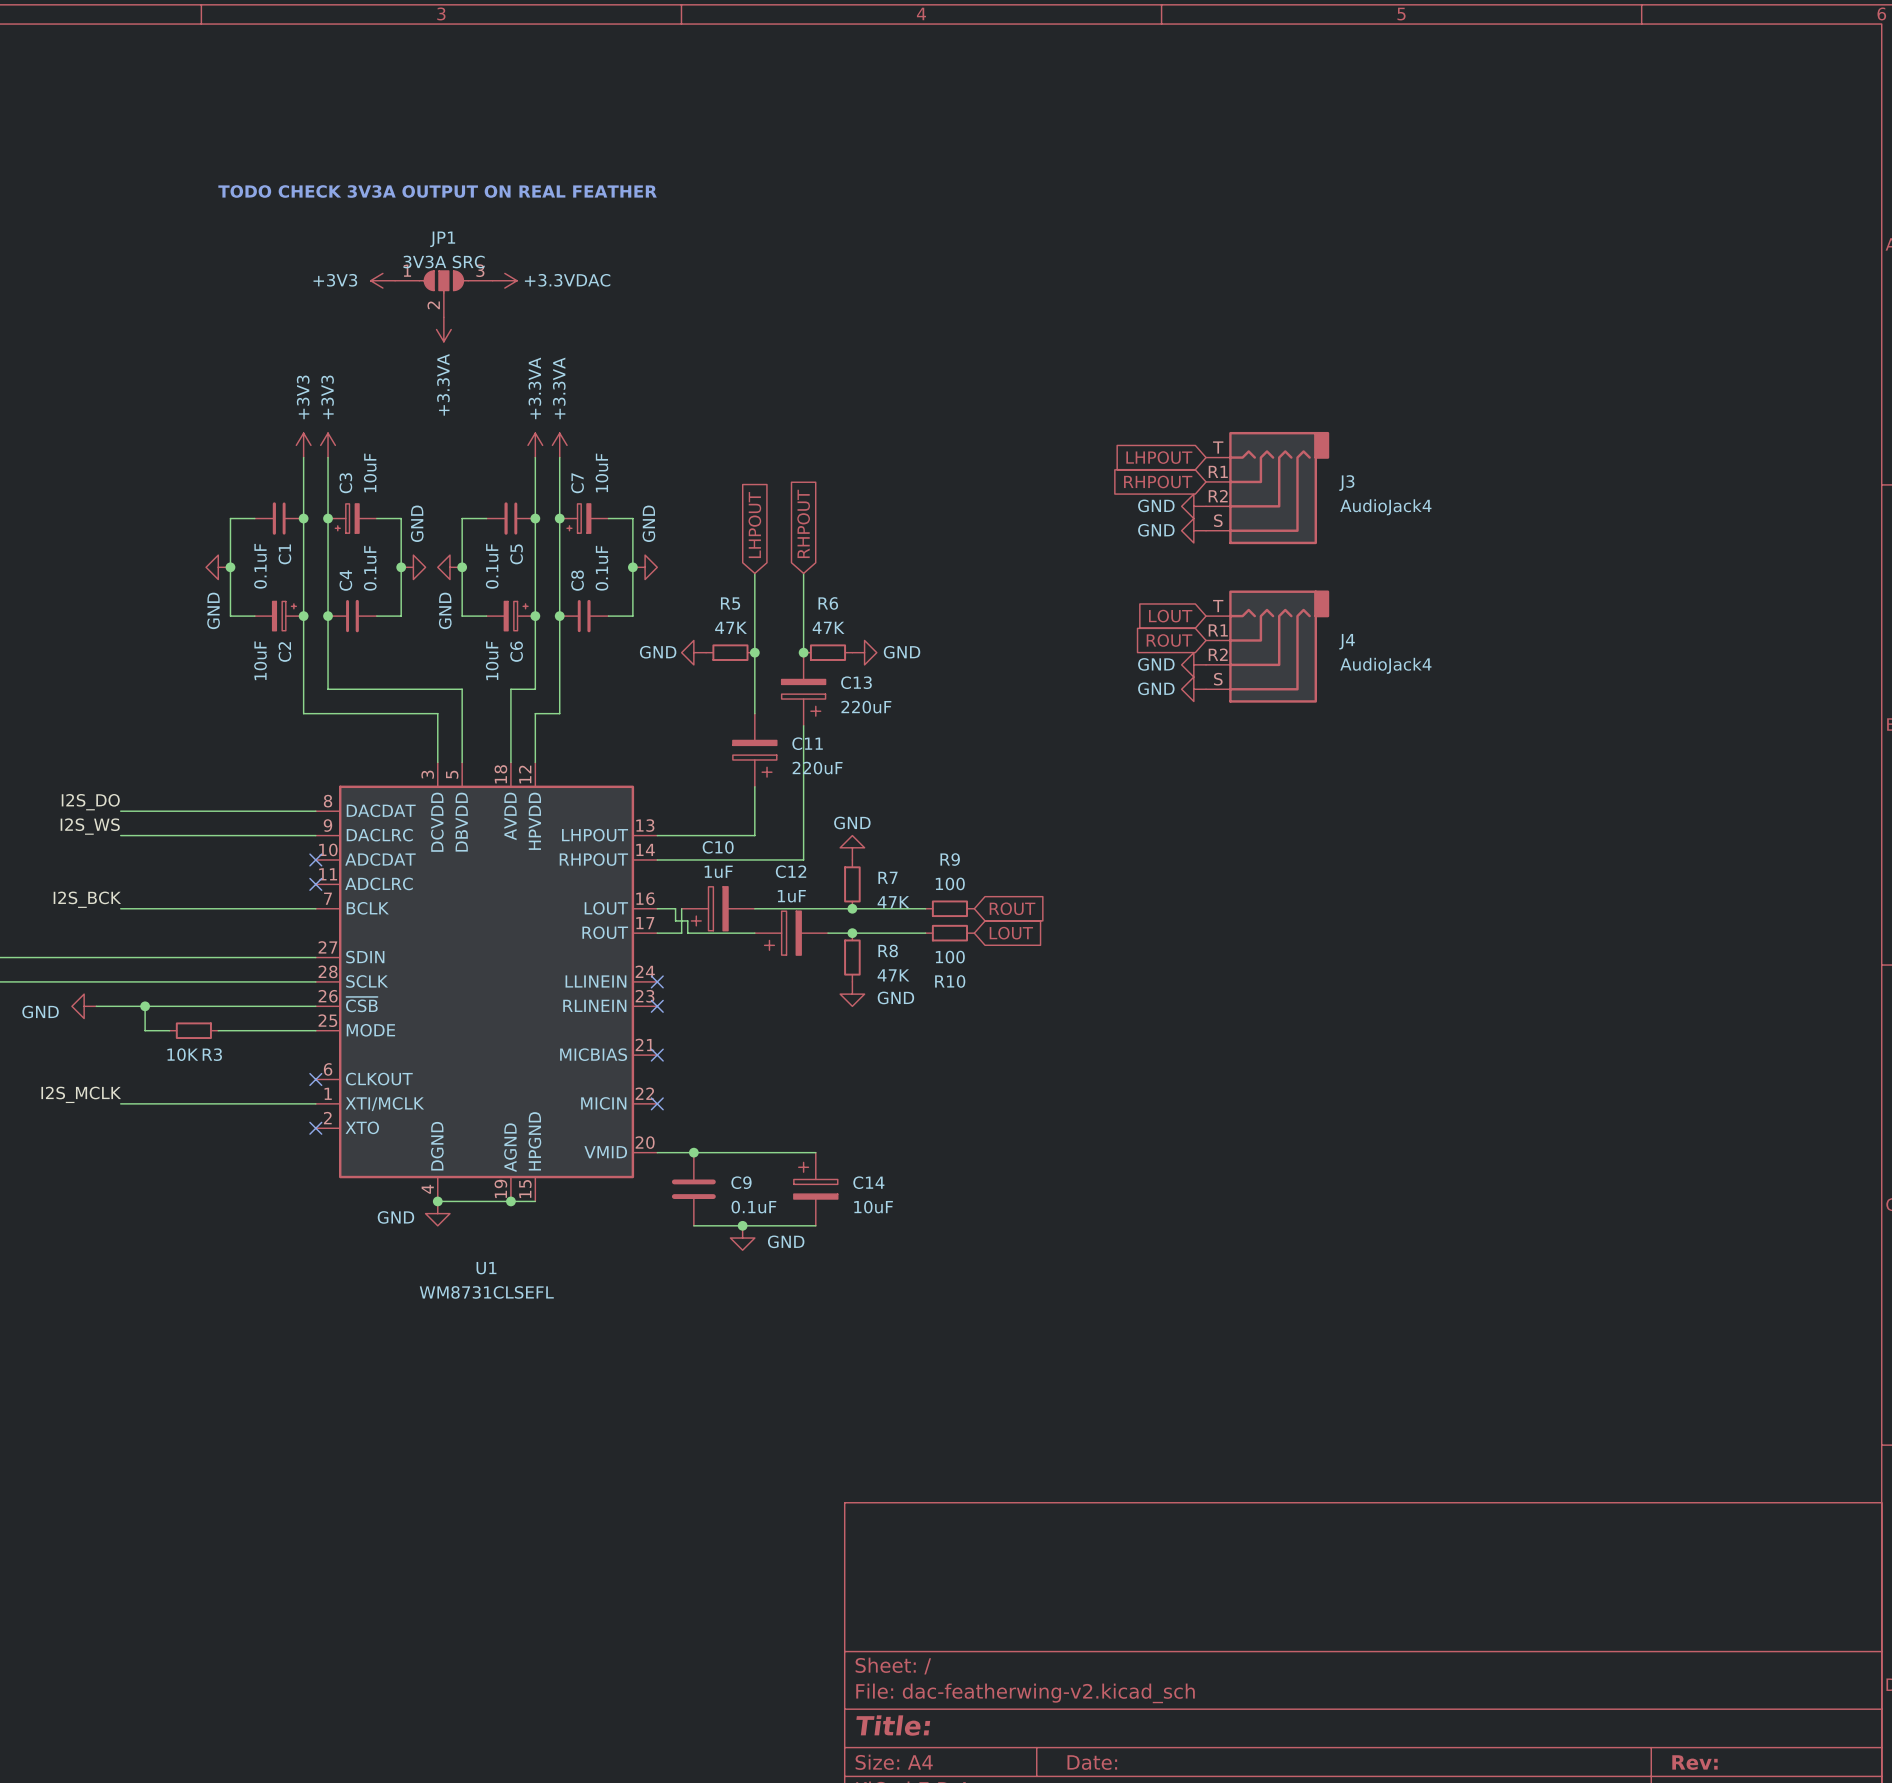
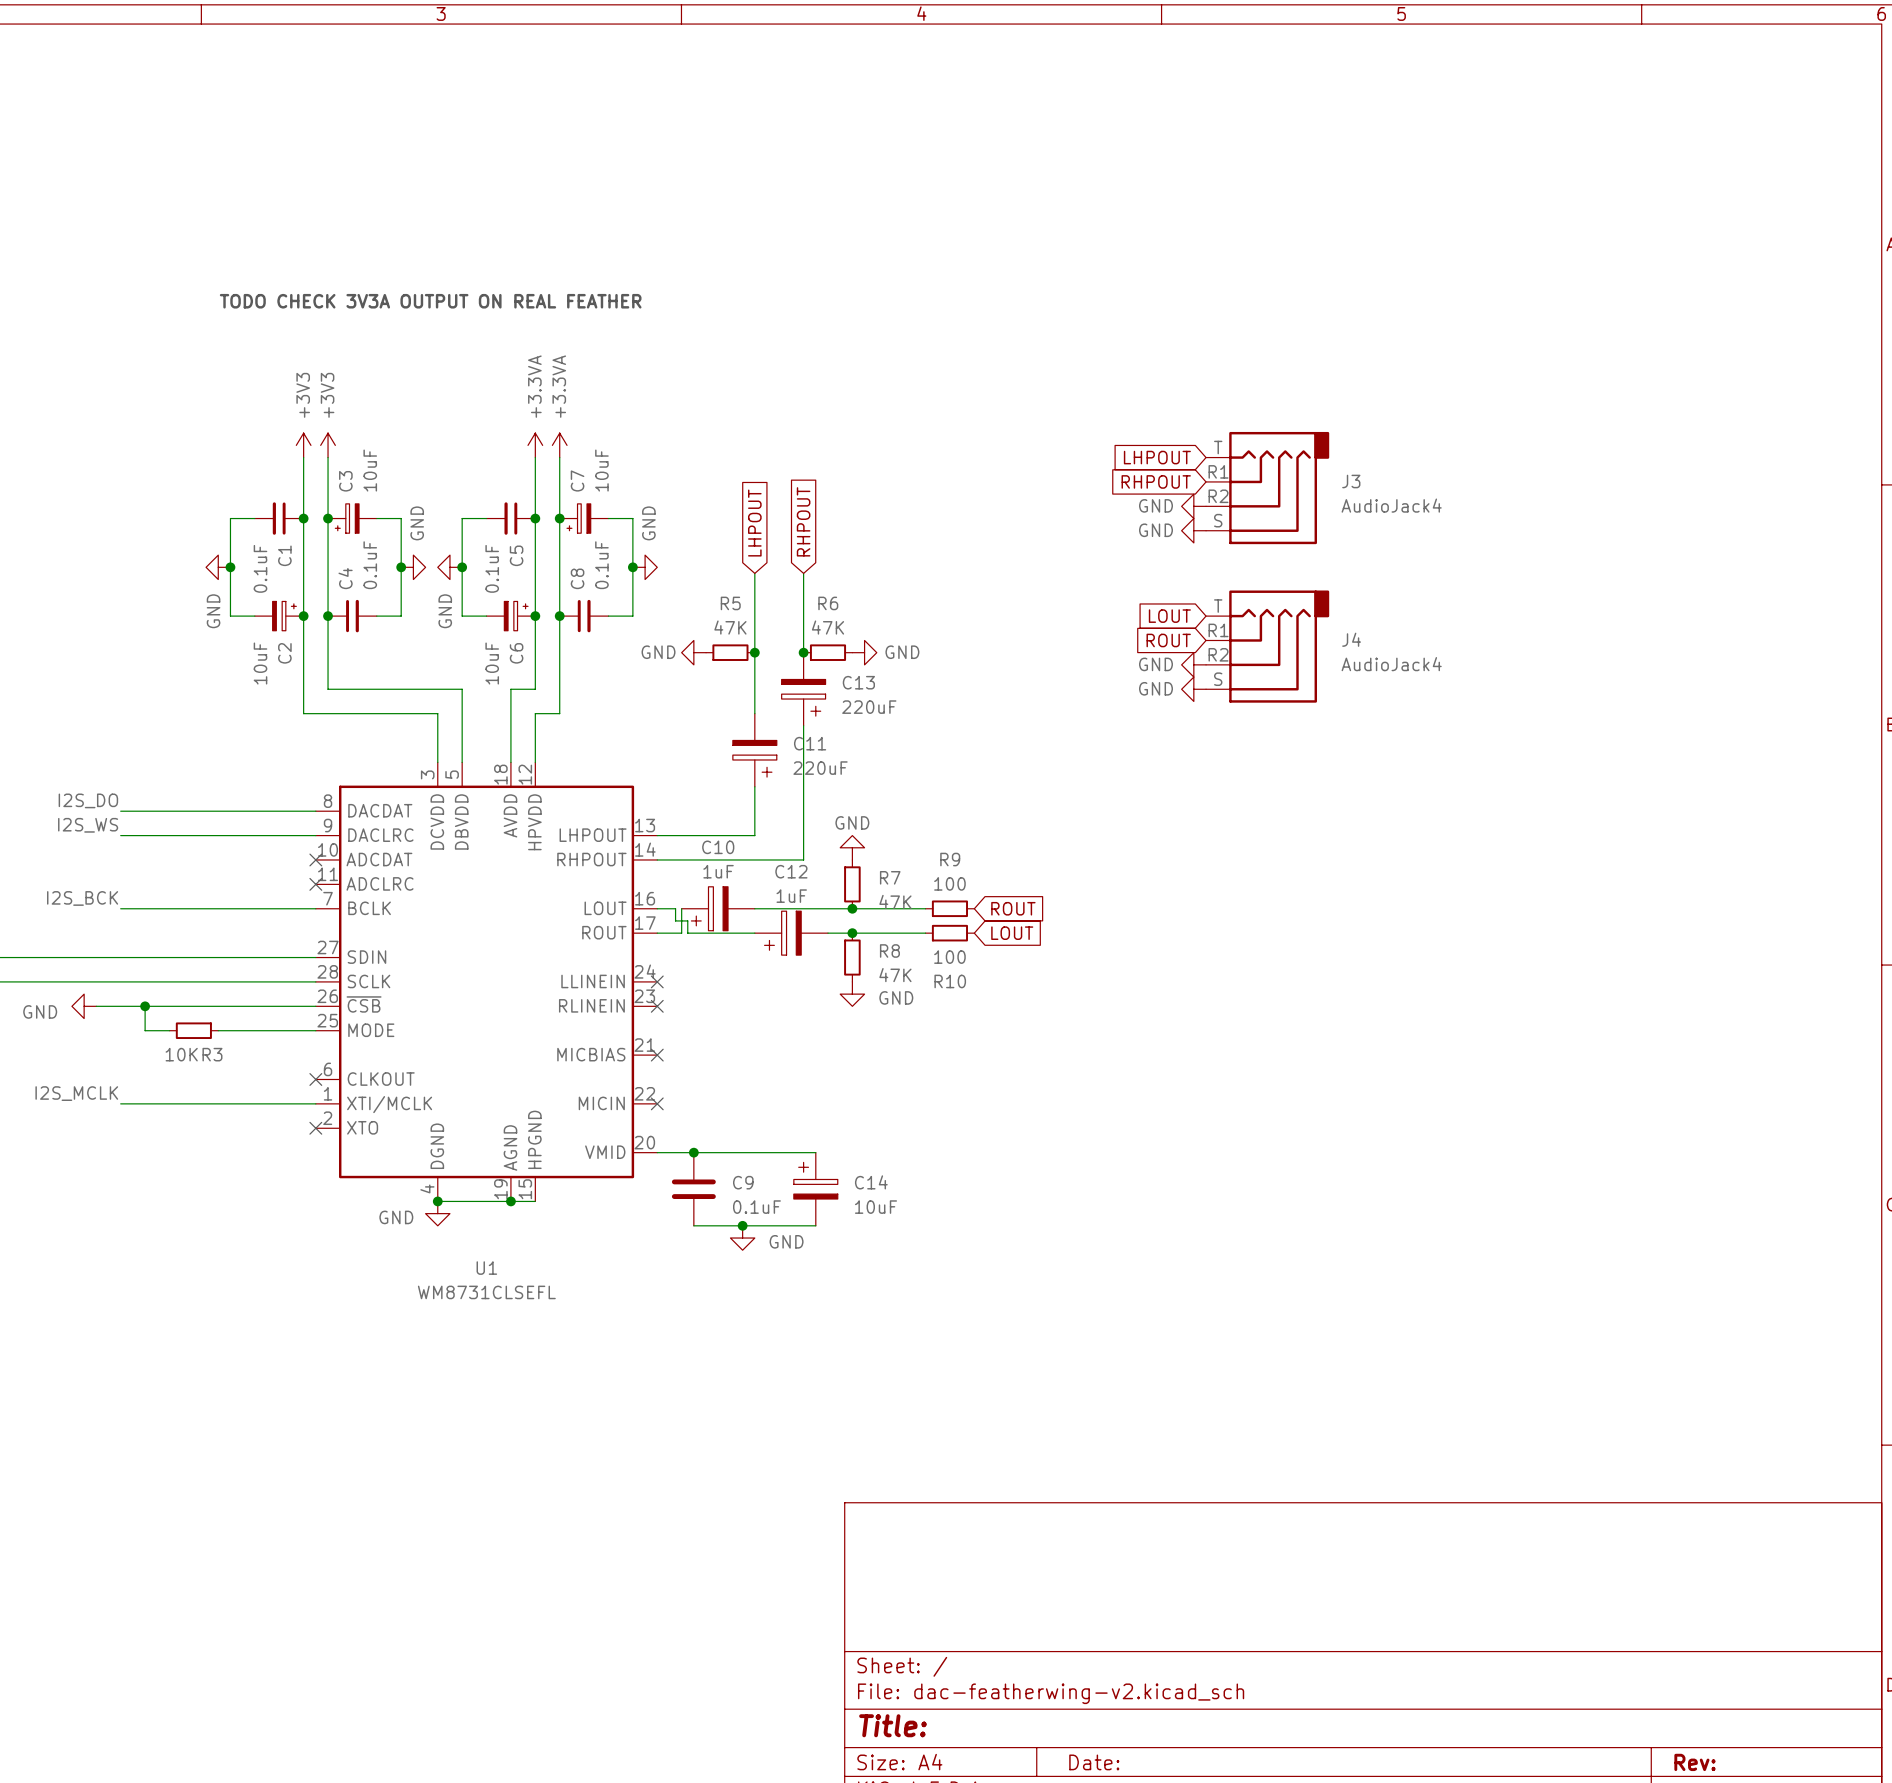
text position: TODO CHECK 3V3A OUTPUT ON REAL FEATHER (437, 191) -> TODO CHECK 3V3A OUTPUT ON REAL FEATHER (430, 301)
power symbol: +3V3 (382, 280) -> none
power symbol: +3.3VDAC (504, 280) -> none
JP1: 3V3A SRC (443, 294) -> none
power symbol: +3.3VA (443, 329) -> none

